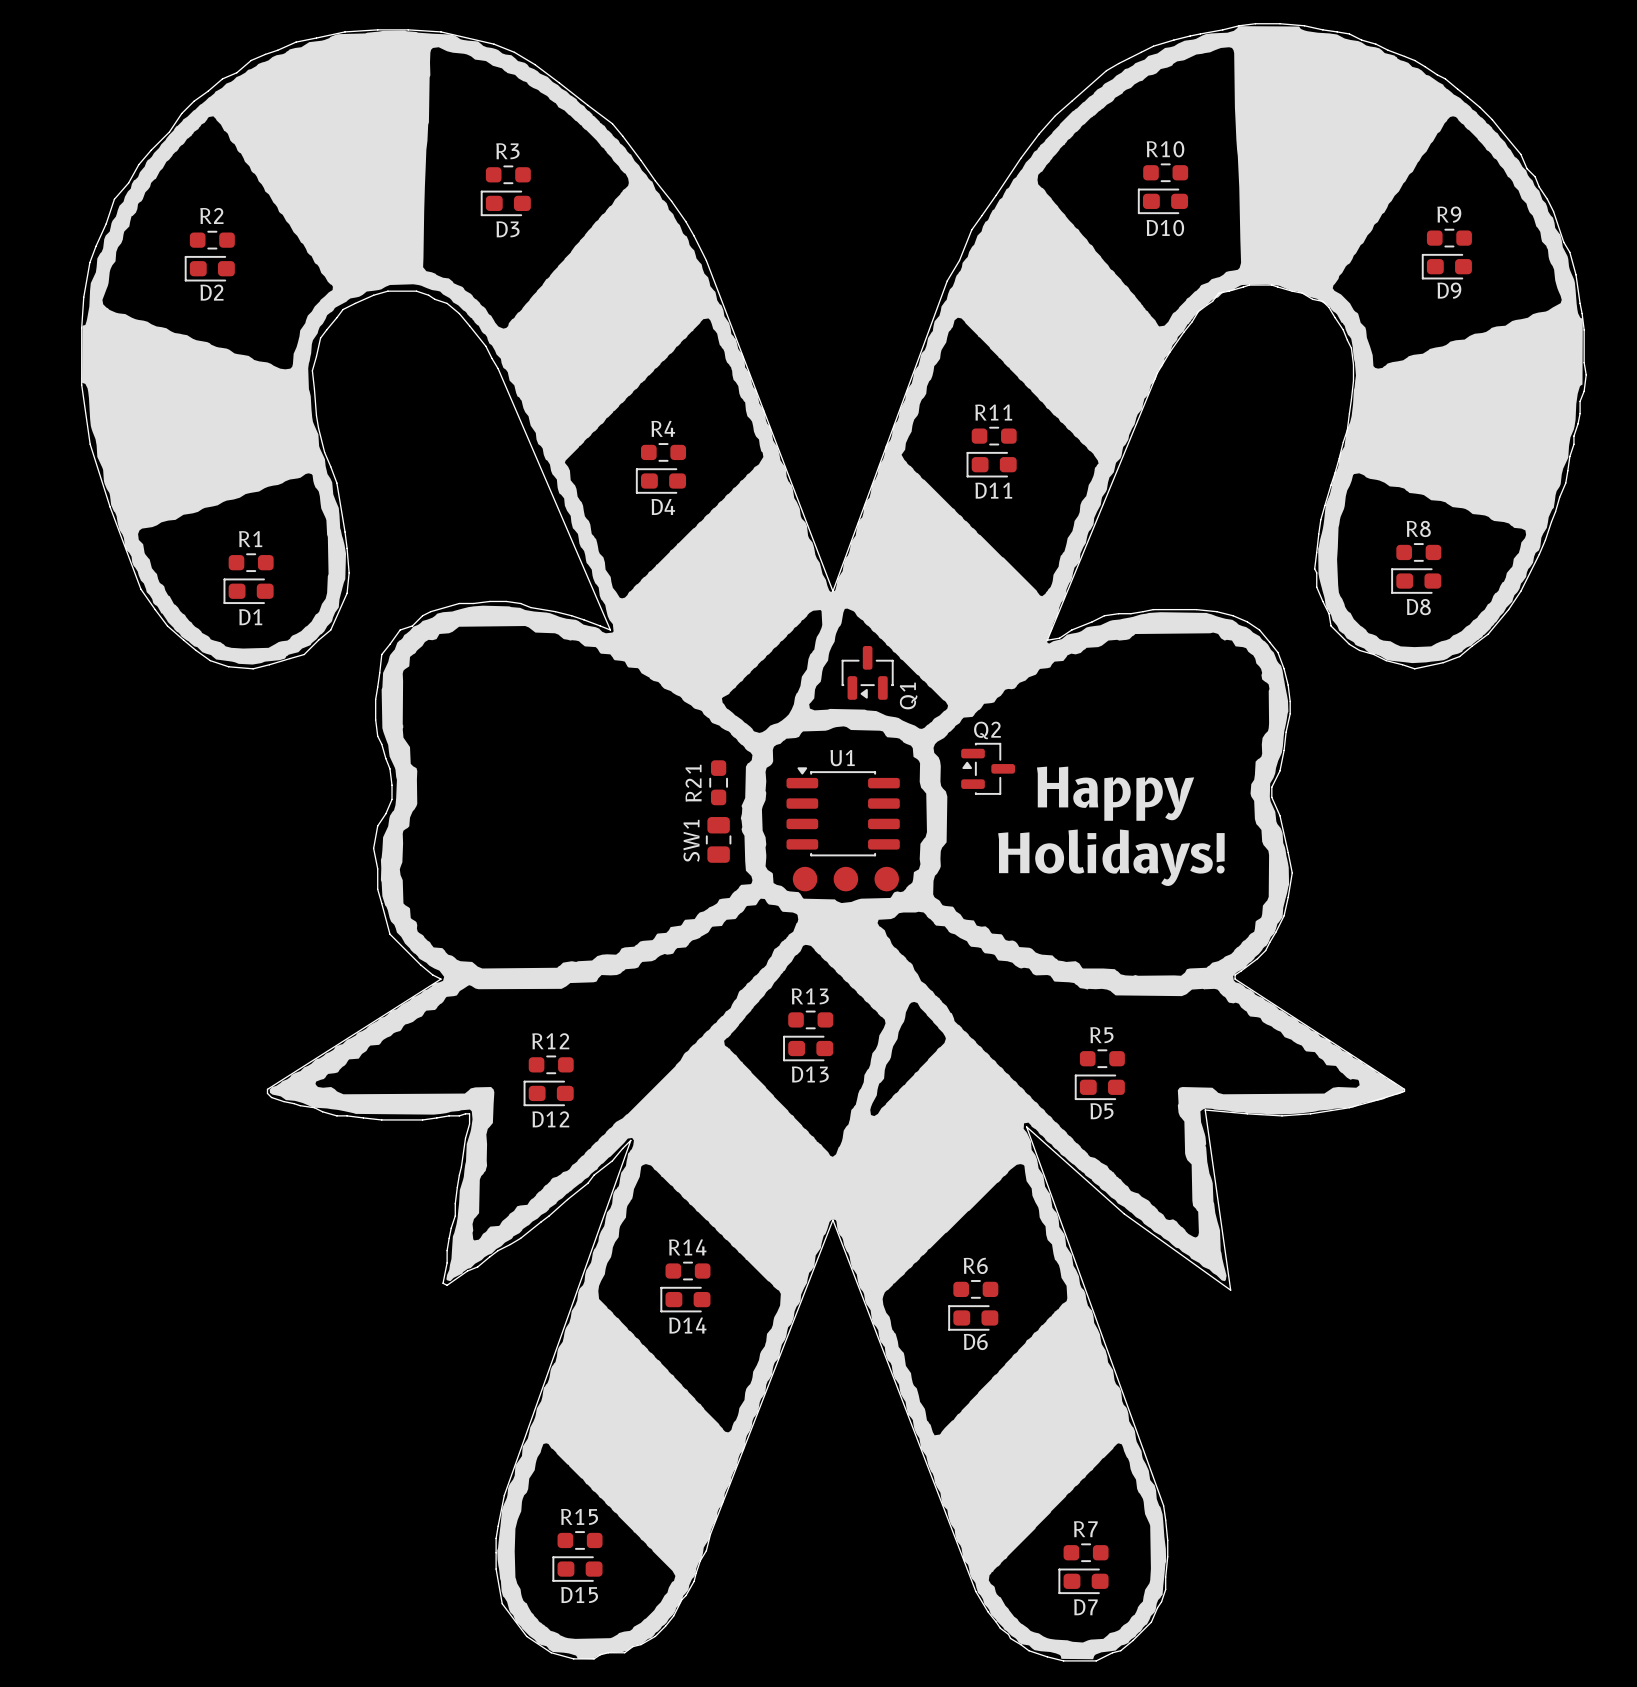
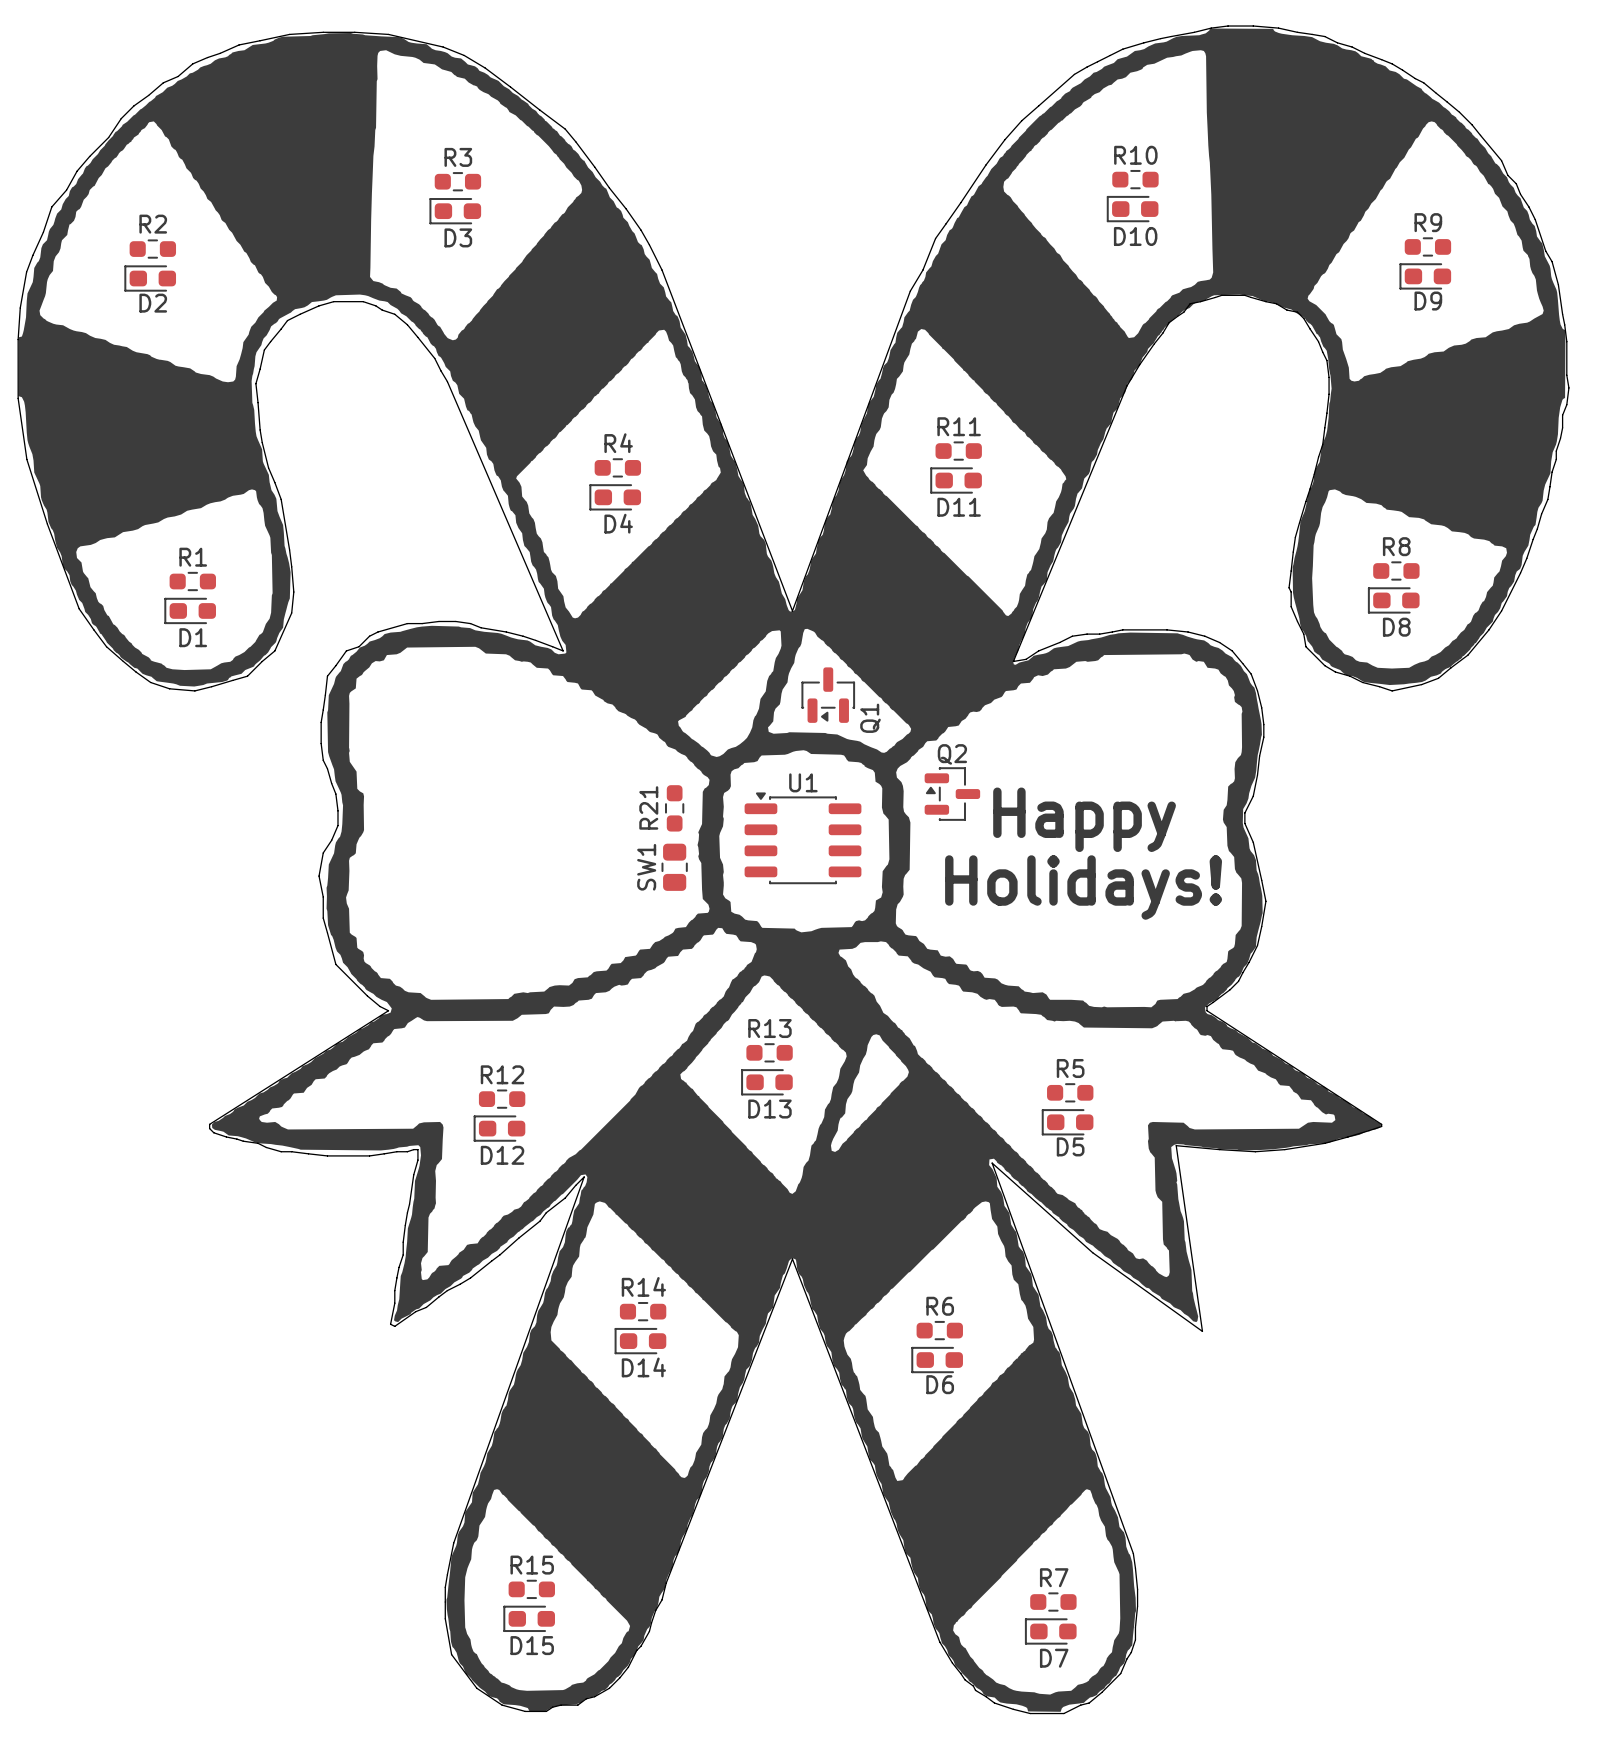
part: (845, 879) -> none

